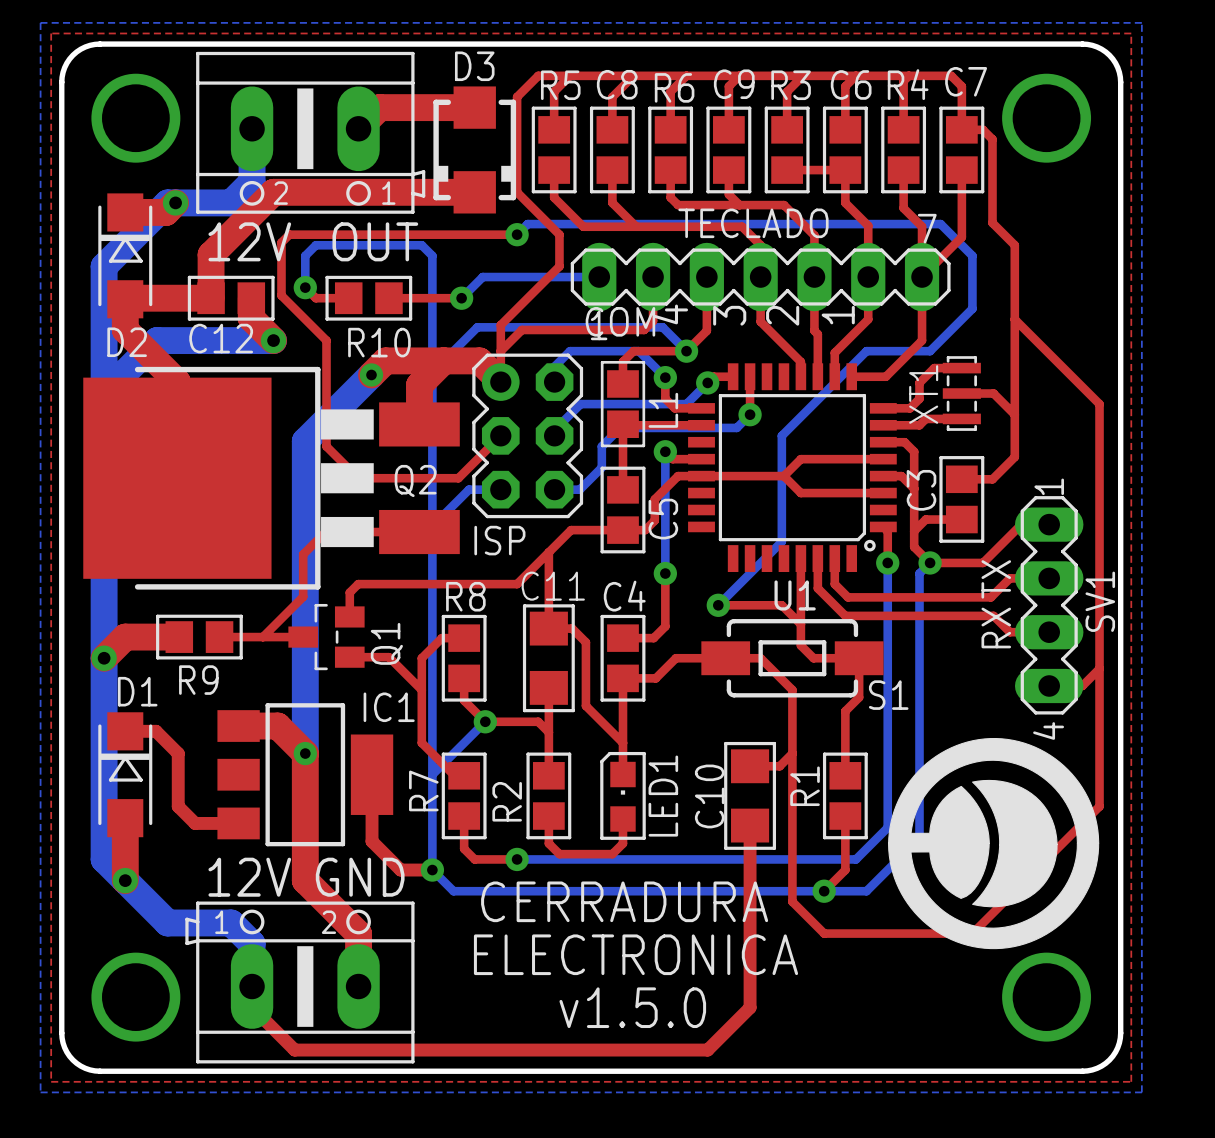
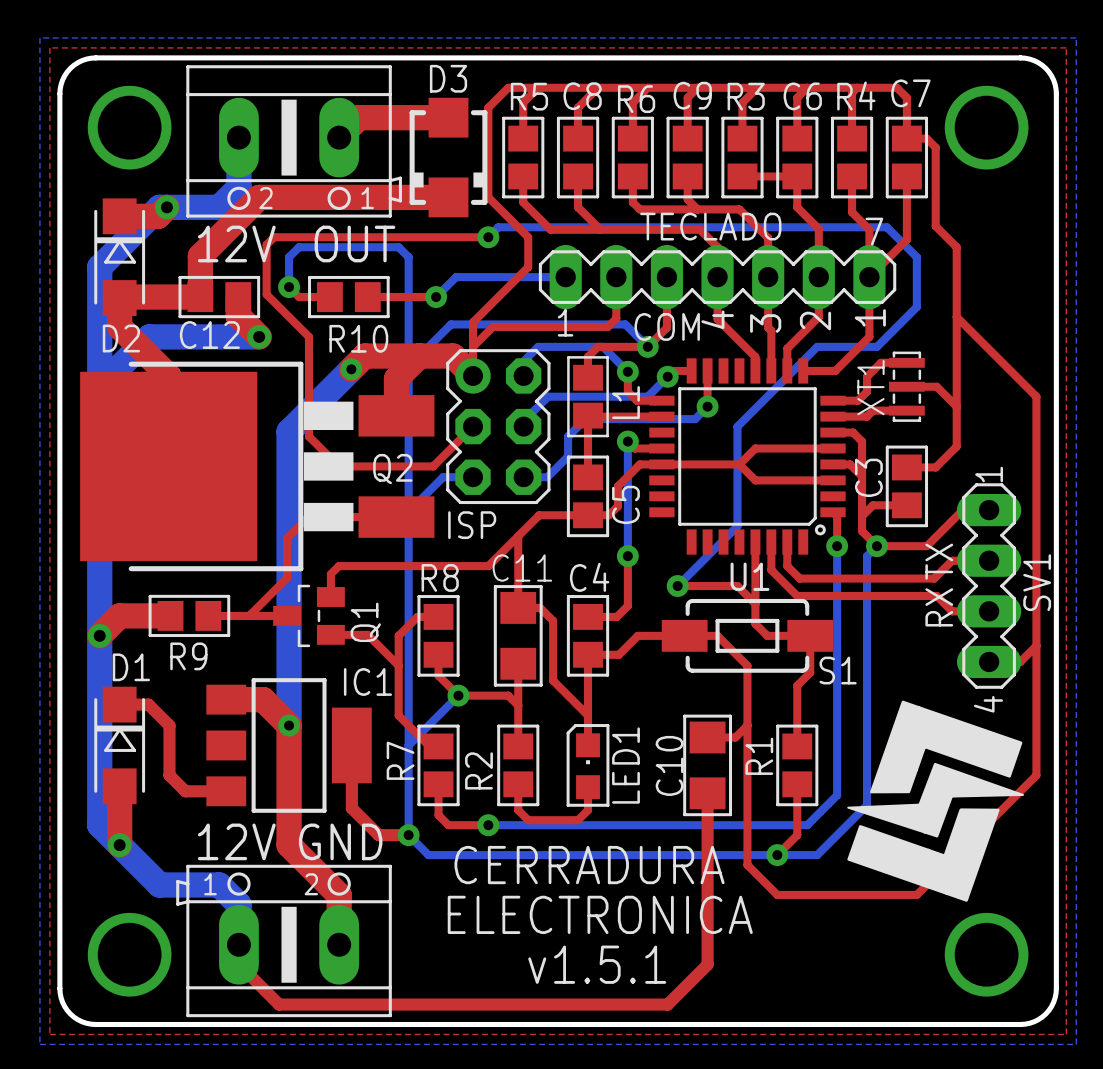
text: 4 (670, 314) -> COM (667, 326)
text position: 3 (729, 315) -> 3 (765, 323)
text position: 2 (782, 315) -> 2 (815, 321)
text position: 1 (838, 315) -> 1 (870, 317)
text: COM (620, 321) -> none
text: none -> 4 (717, 319)
drawing shape: [888, 738, 1100, 950] -> [847, 700, 1025, 902]
text: v1.5.0 (632, 1007) -> v1.5.1 (597, 964)

